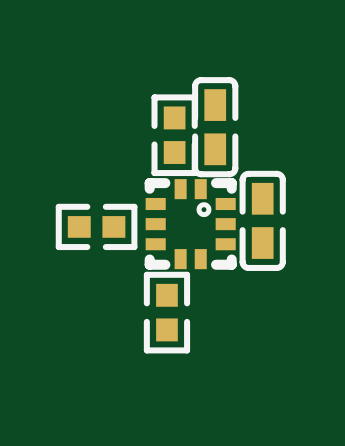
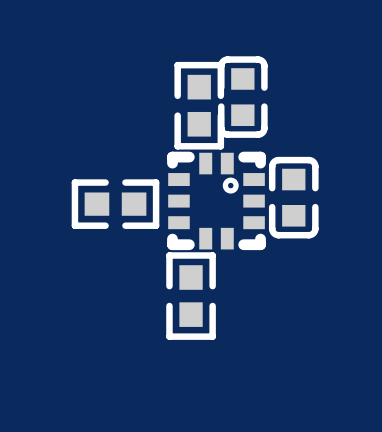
part footprint: [192, 77, 239, 178] -> [218, 56, 268, 138]
part footprint: [239, 170, 286, 271] -> [268, 156, 319, 239]

